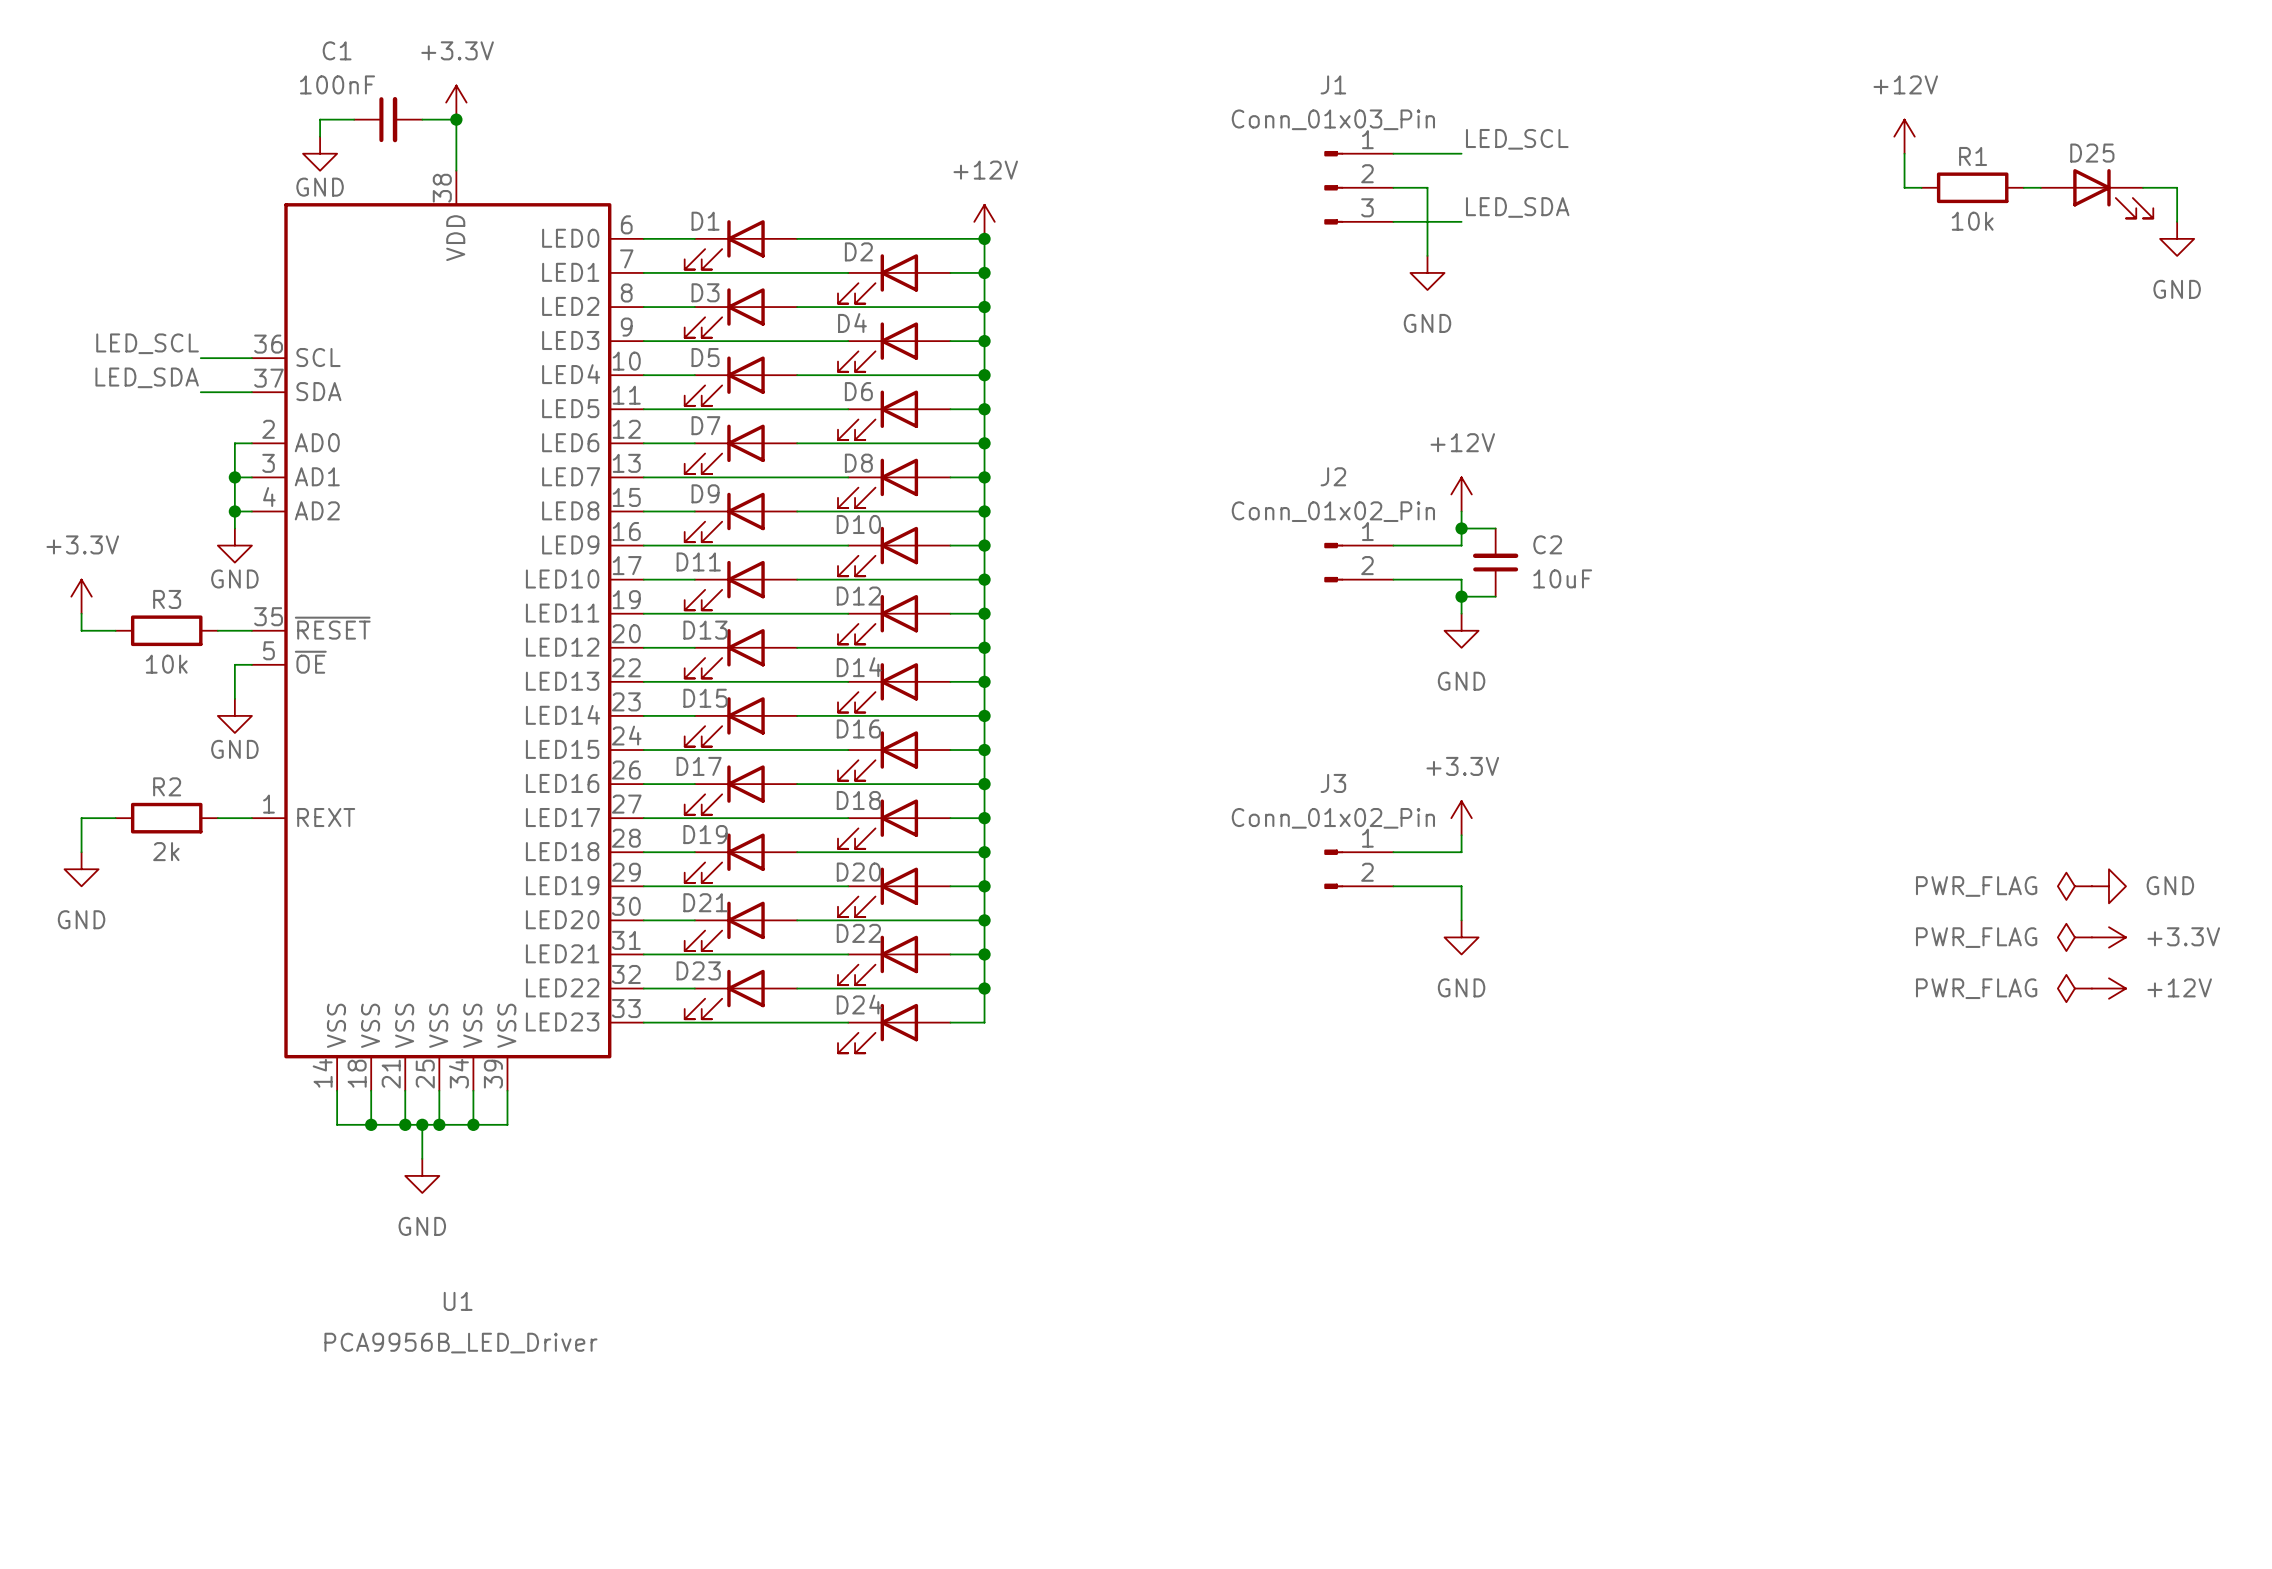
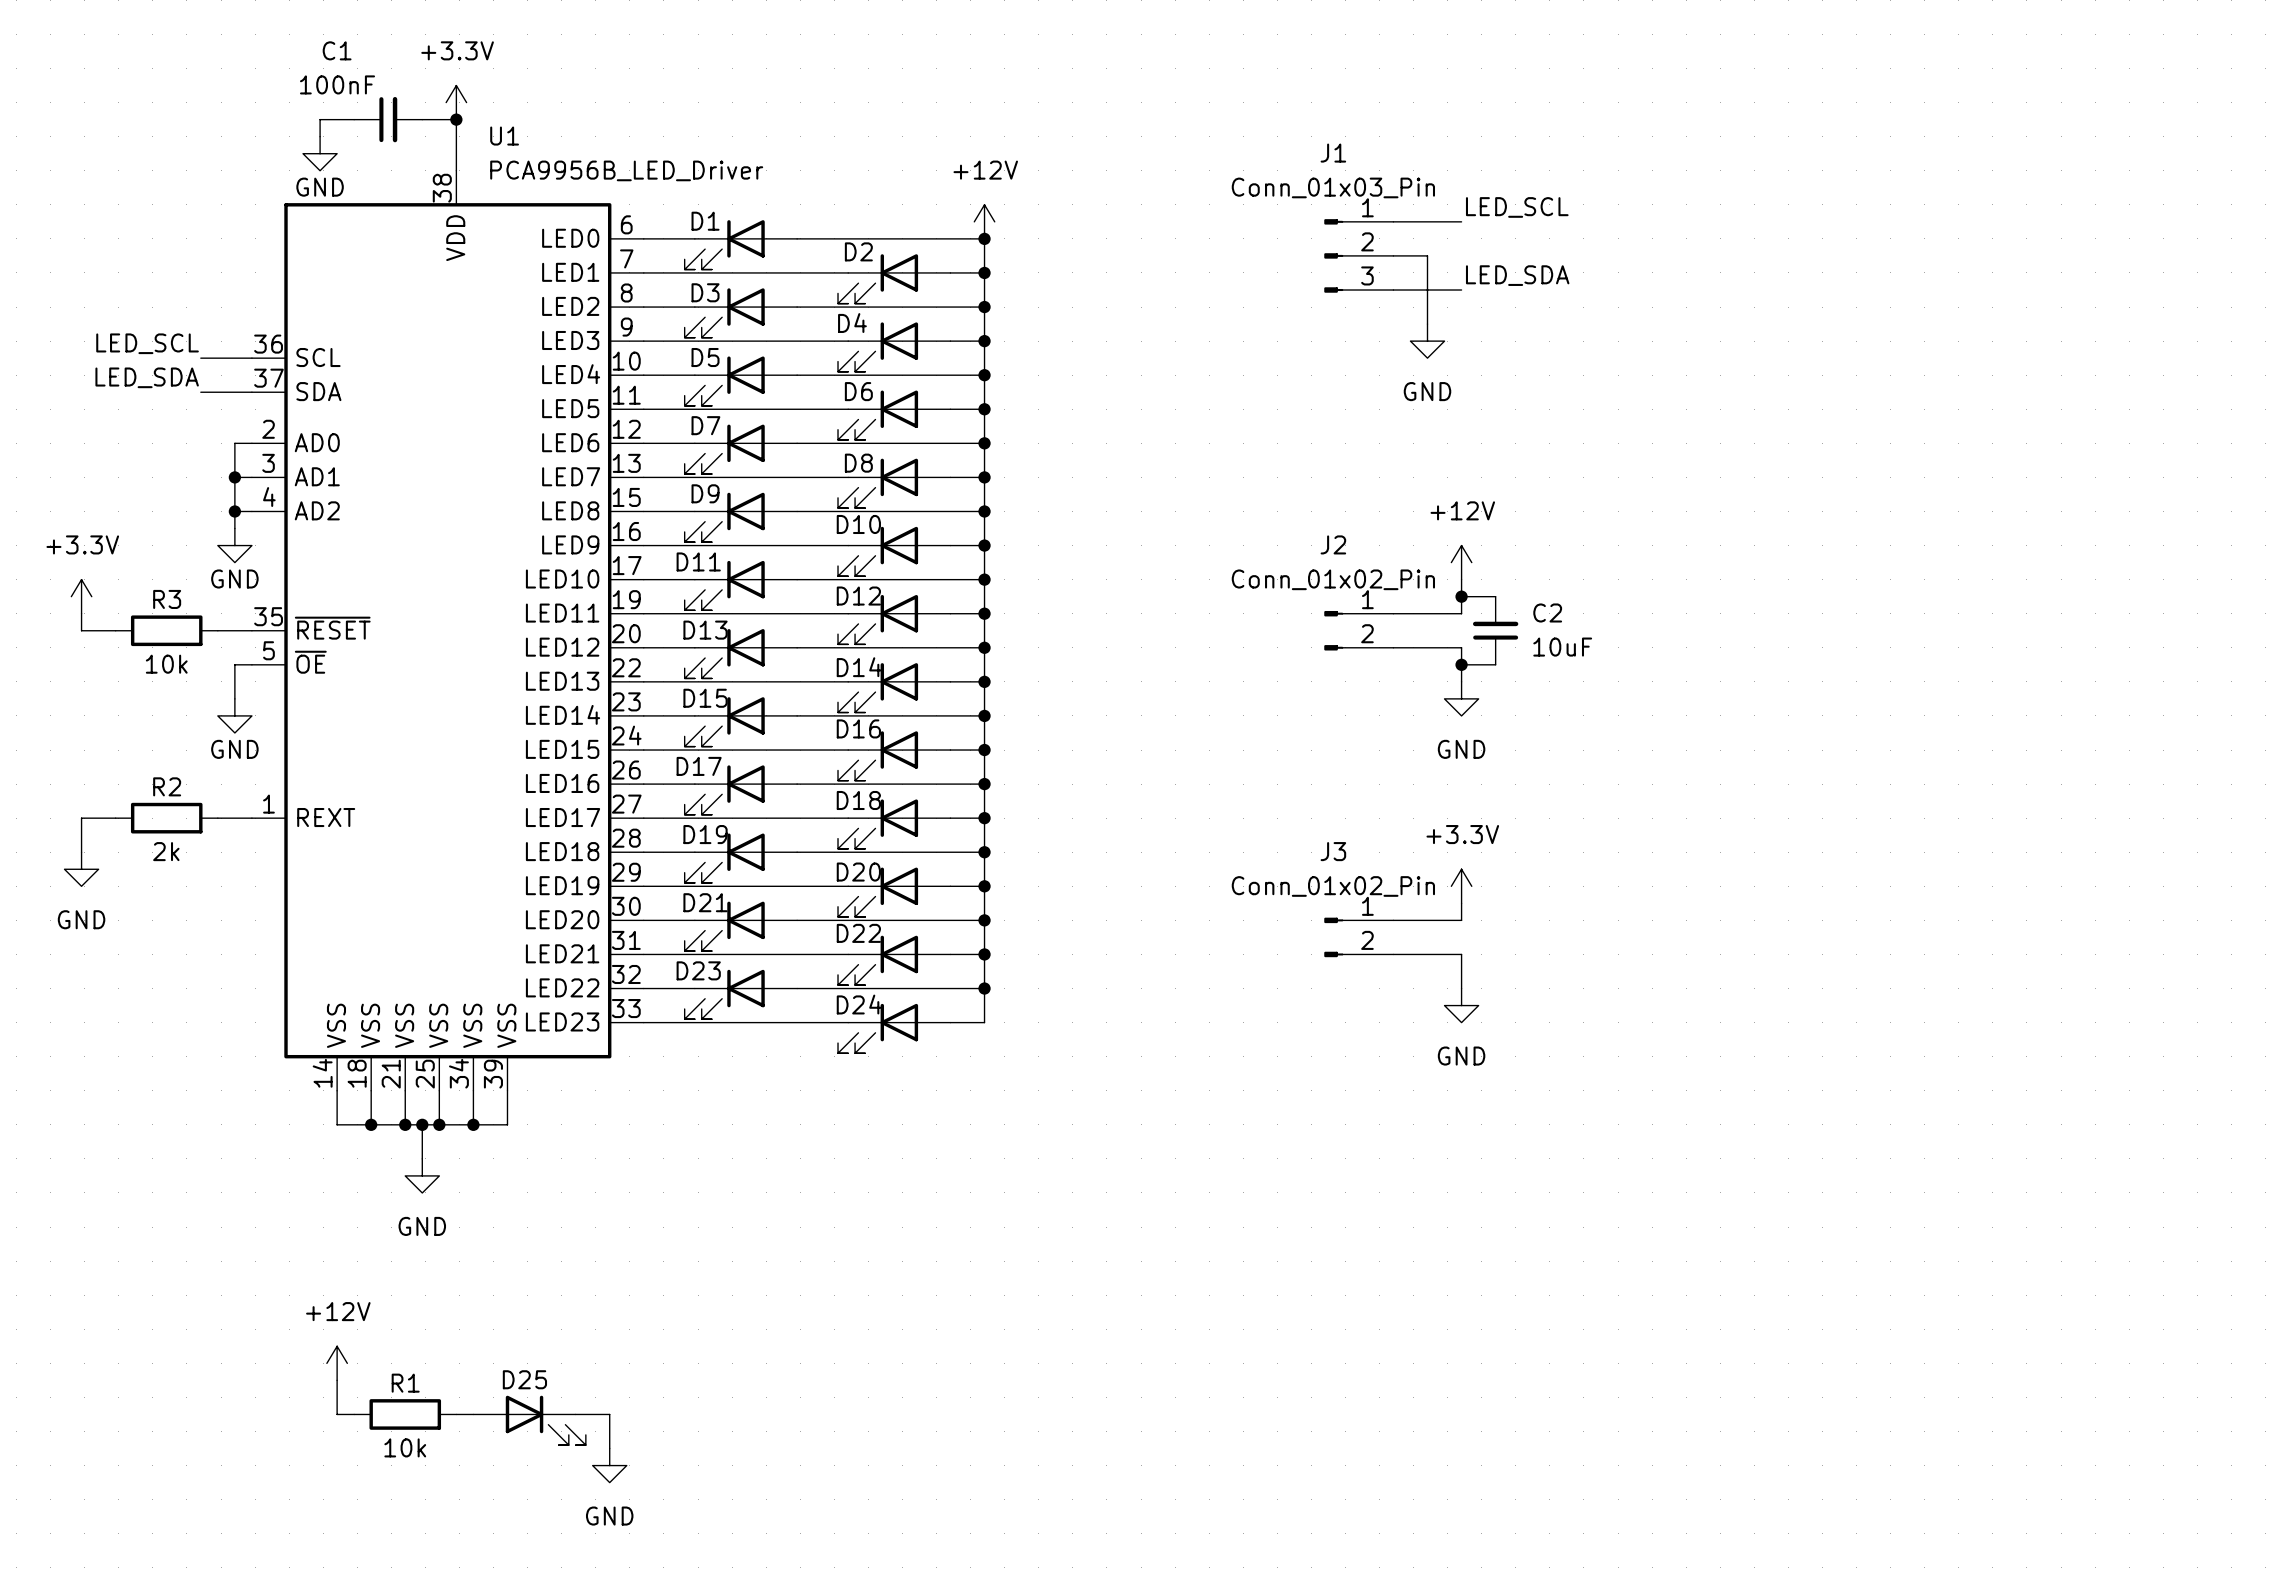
power symbol: +12V (1904, 136) -> none
label: LED_SCL (1517, 139) -> none
wire: (1393, 153) (1461, 153) -> (1393, 290) (1461, 290)
wire: (1904, 153) (1904, 187) (1921, 187) -> none
J1 position: (1358, 187) -> (1358, 255)
wire: (1393, 187) (1427, 187) (1427, 255) -> (1393, 255) (1427, 255) (1427, 324)
R1 position: (1972, 187) -> (405, 1414)
wire: (2023, 187) (2040, 187) -> none
wire: (2143, 187) (2177, 187) (2177, 221) -> none
D25 position: (2097, 193) -> (529, 1420)
label: LED_SDA (1517, 207) -> LED_SCL (1517, 207)
power symbol: GND (2177, 238) -> none
power symbol position: GND (1427, 272) -> GND (1427, 341)
label: none -> LED_SDA (1517, 275)
power symbol position: +12V (1461, 494) -> +12V (1461, 562)
wire: (1461, 511) (1461, 545) (1393, 545) -> none
wire: (1461, 528) (1495, 528) -> (1461, 664) (1495, 664)
junction: (1461, 528) -> none
J2 position: (1358, 562) -> (1358, 630)
C2 position: (1495, 562) -> (1495, 630)
wire: (1393, 579) (1461, 579) -> (1393, 613) (1461, 613)
power symbol position: GND (1461, 630) -> GND (1461, 698)
wire: none -> (1393, 647) (1461, 647) (1461, 681)
junction: none -> (1461, 664)
power symbol position: +3.3V (1461, 818) -> +3.3V (1461, 886)
wire: (1461, 835) (1461, 852) (1393, 852) -> none
J3 position: (1358, 869) -> (1358, 937)
wire: (1393, 886) (1461, 886) (1461, 903) -> none
power symbol: PWR_FLAG (2074, 886) -> none
power symbol: GND (2108, 886) -> none
wire: none -> (1393, 920) (1461, 920)
power symbol position: GND (1461, 937) -> GND (1461, 1005)
power symbol: PWR_FLAG (2074, 937) -> none
power symbol: +3.3V (2108, 937) -> none
wire: none -> (1393, 954) (1461, 954) (1461, 988)
power symbol: PWR_FLAG (2074, 988) -> none
power symbol: +12V (2108, 988) -> none
U1 name position: U1 (458, 1301) -> U1 (504, 136)
U1 value position: PCA9956B_LED_Driver (460, 1343) -> PCA9956B_LED_Driver (626, 170)
power symbol: none -> +12V (337, 1363)
wire: none -> (337, 1380) (337, 1414) (354, 1414)
wire: none -> (456, 1414) (473, 1414)
wire: none -> (575, 1414) (609, 1414) (609, 1448)
power symbol: none -> GND (609, 1465)

